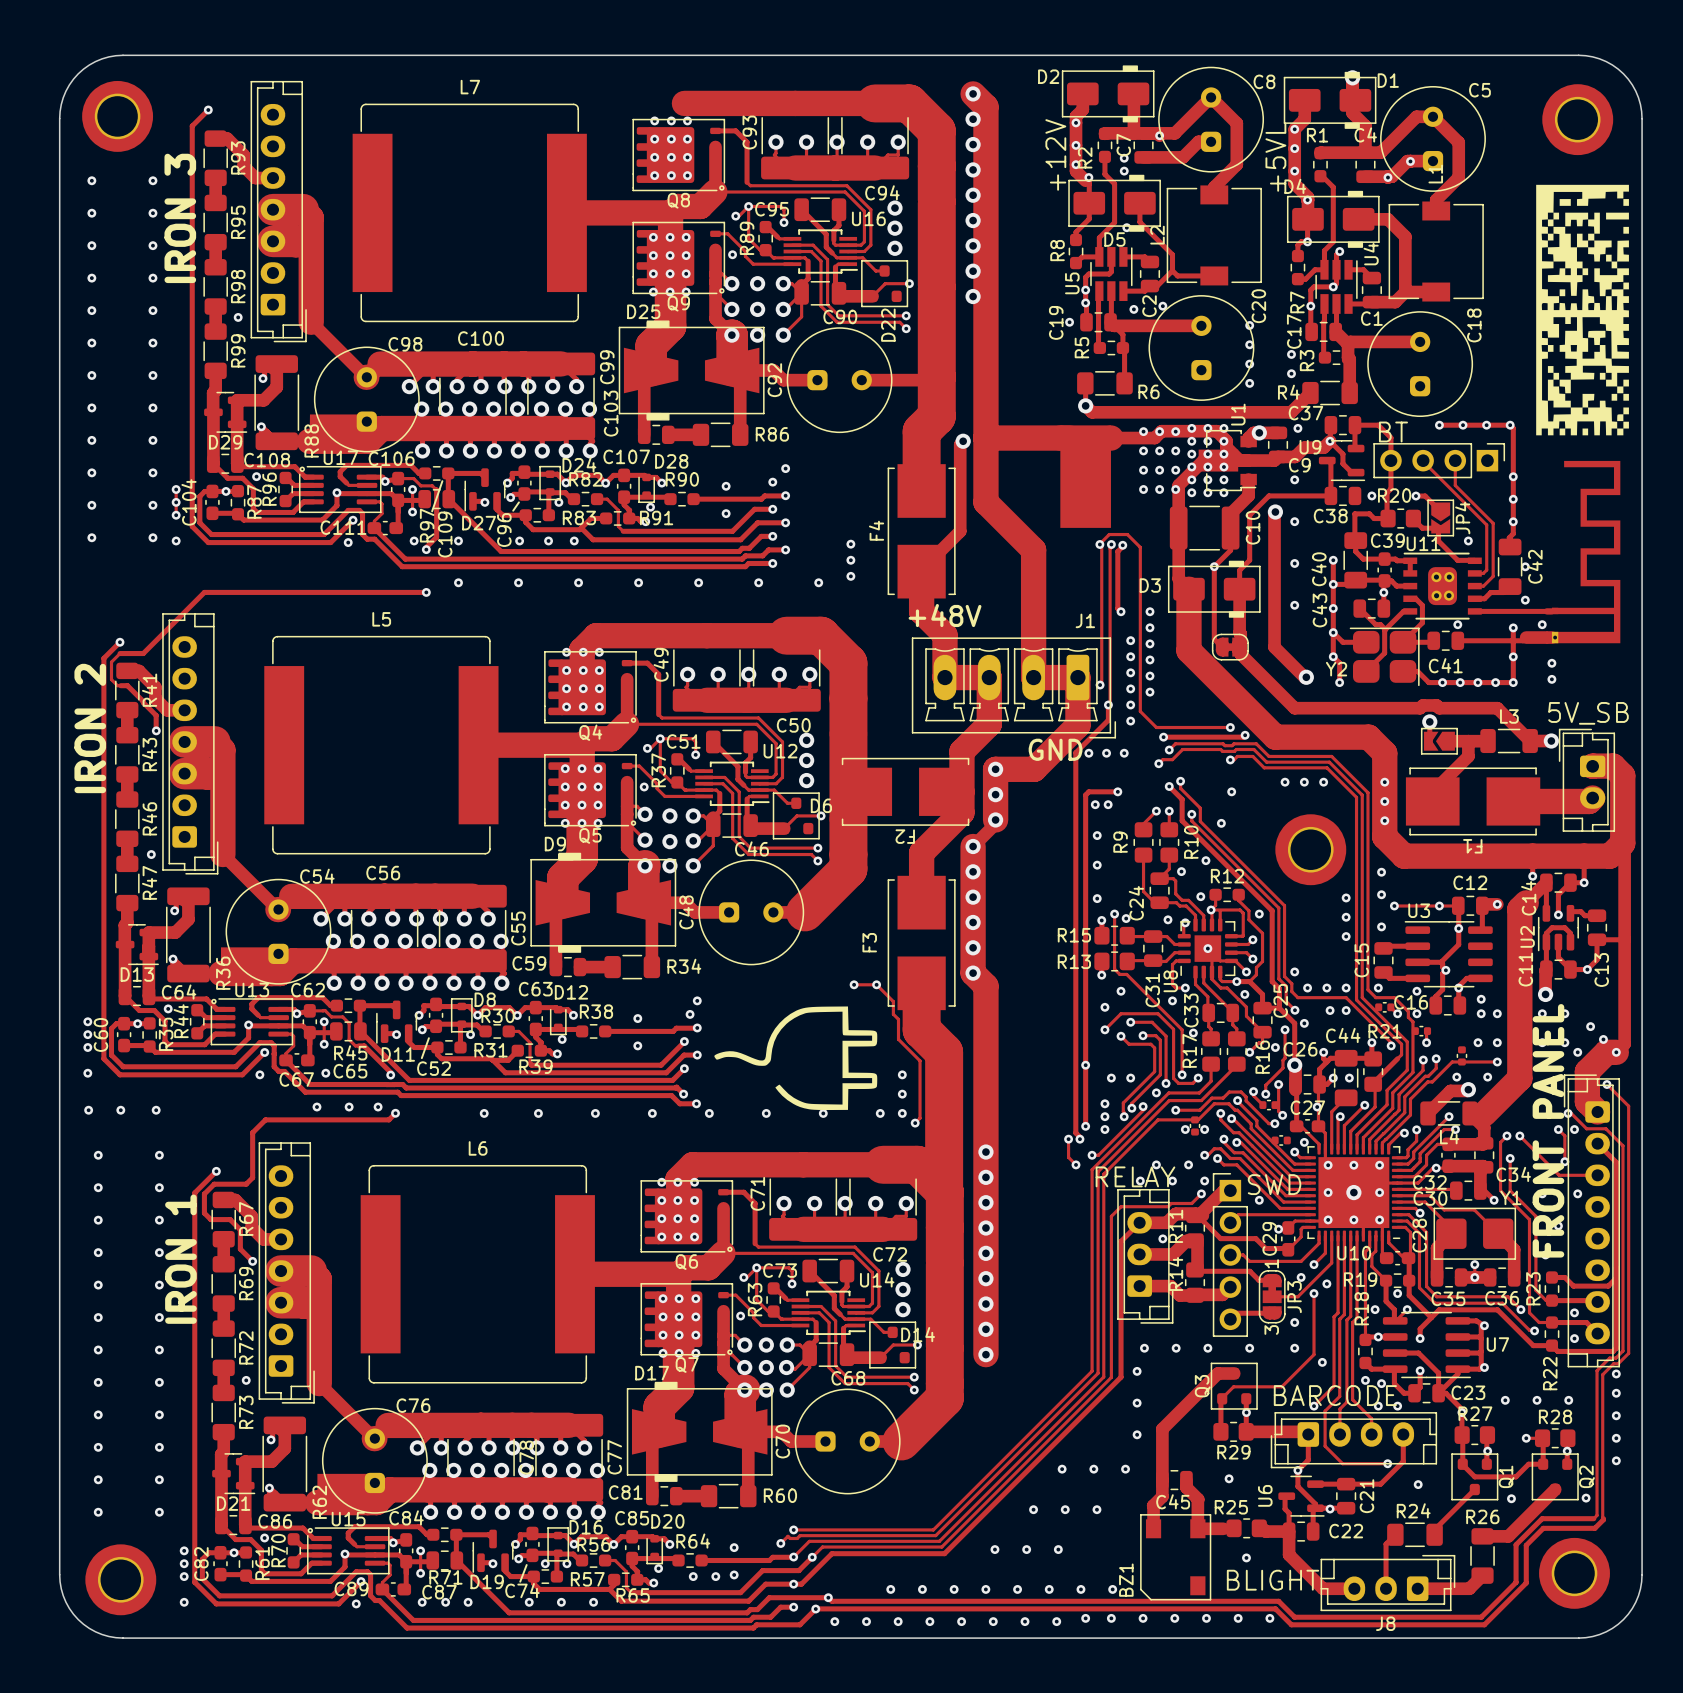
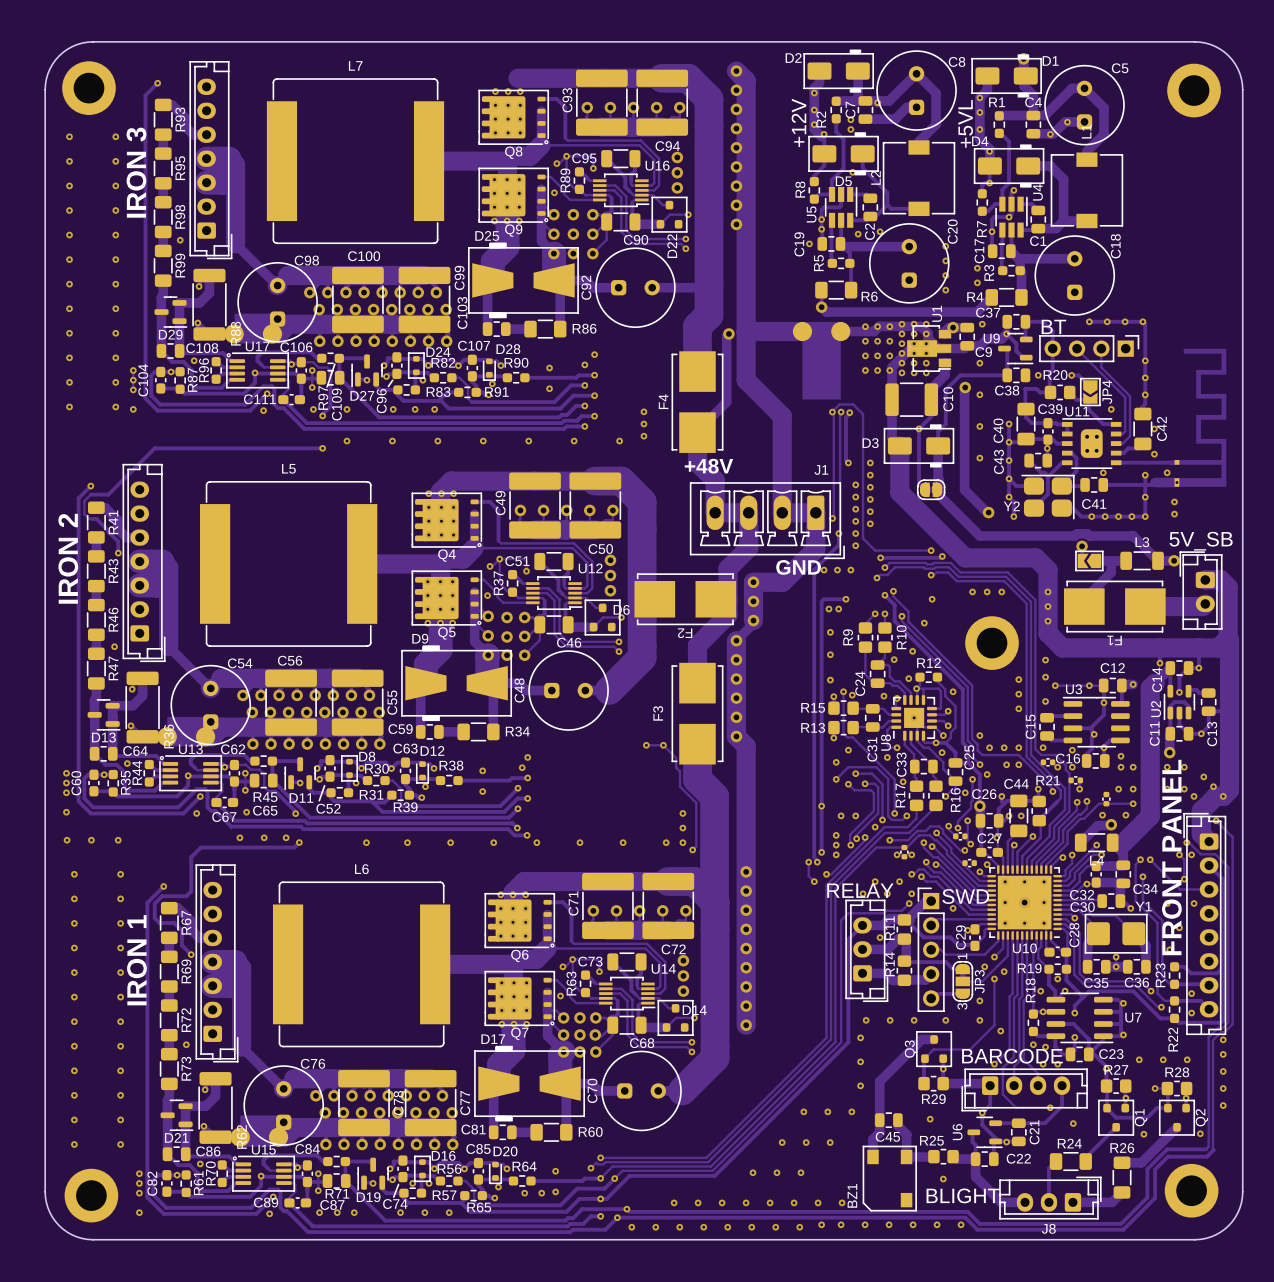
drawing: [1536, 184, 1629, 436] -> none
track width: thin (1624, 845) (1624, 1044) (1616, 1052) -> thick (1229, 639) (1229, 790) (1223, 796)
drawing: [714, 1006, 878, 1111] -> none

